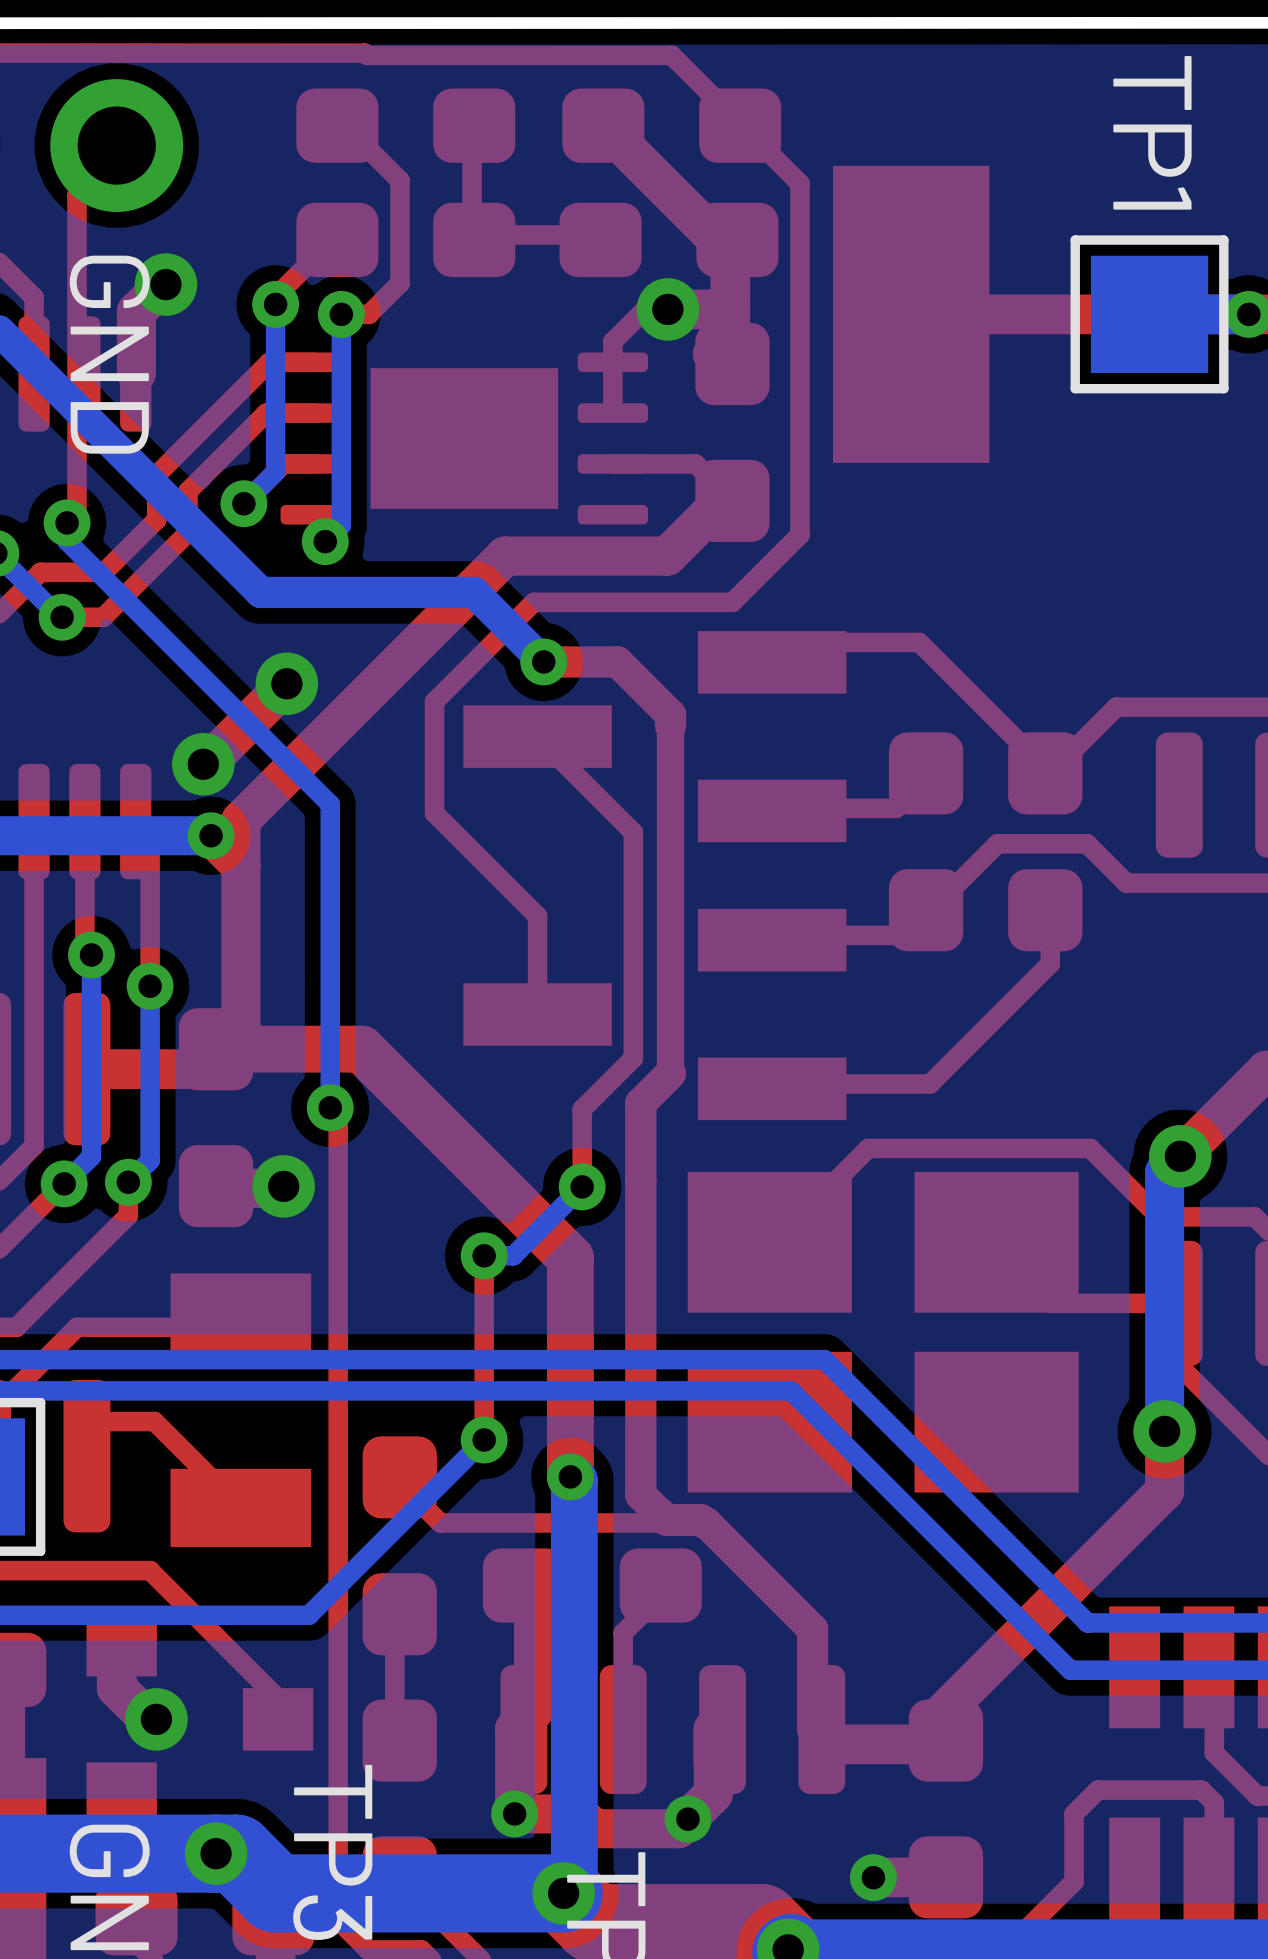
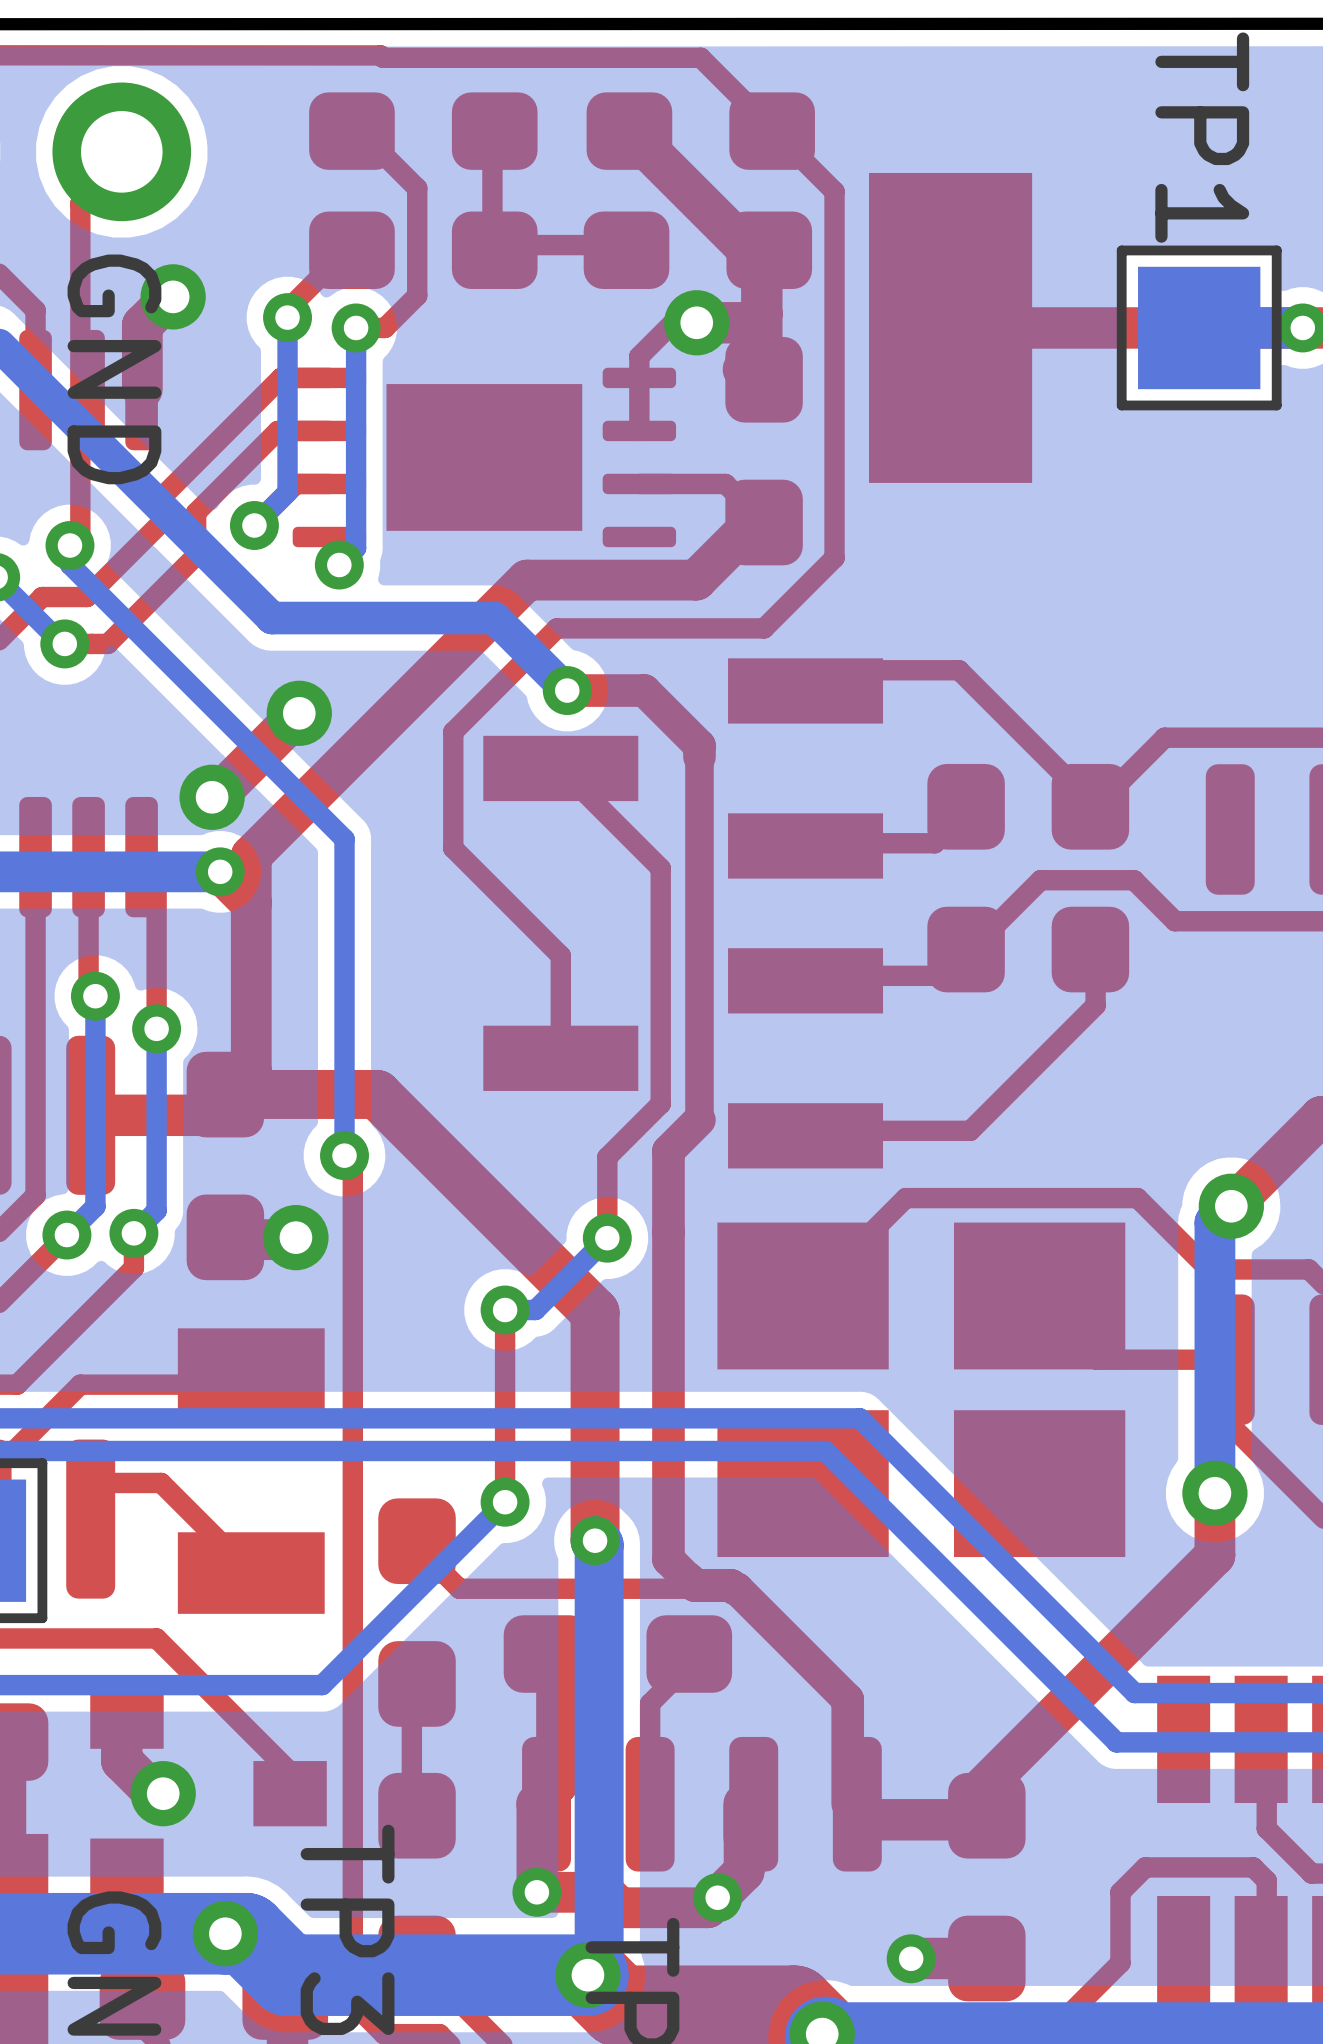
top track: (156, 498) (156, 519) (104, 572) (83, 572) -> (163, 520) (86, 597)

